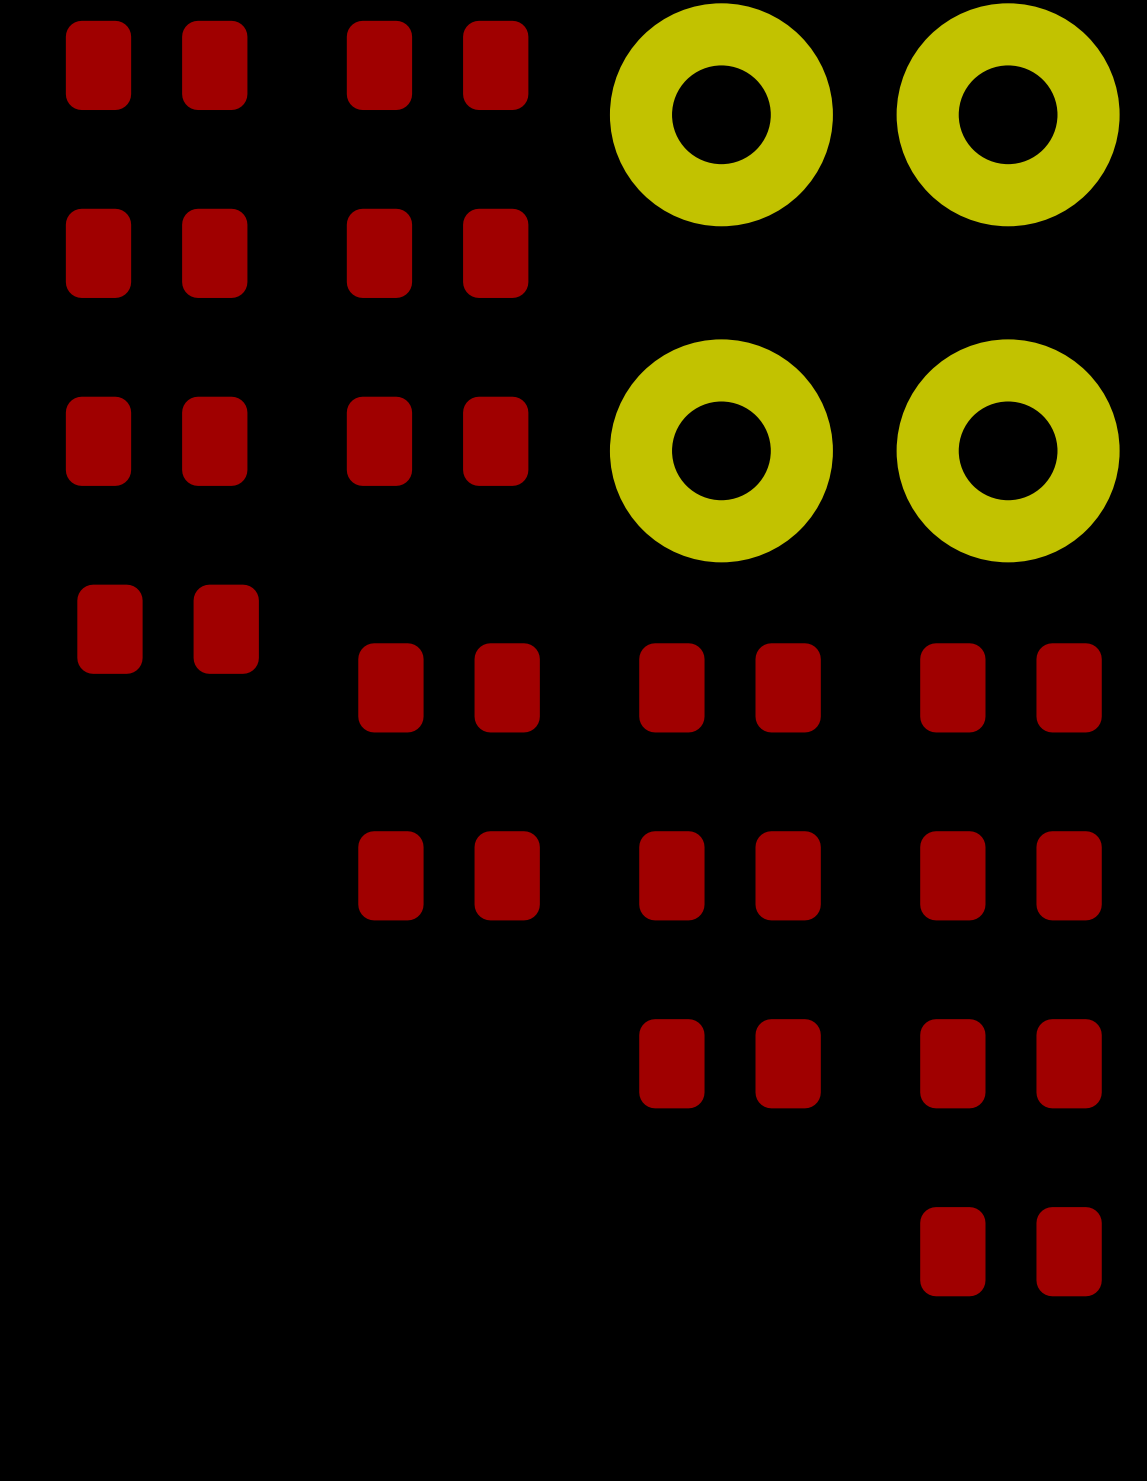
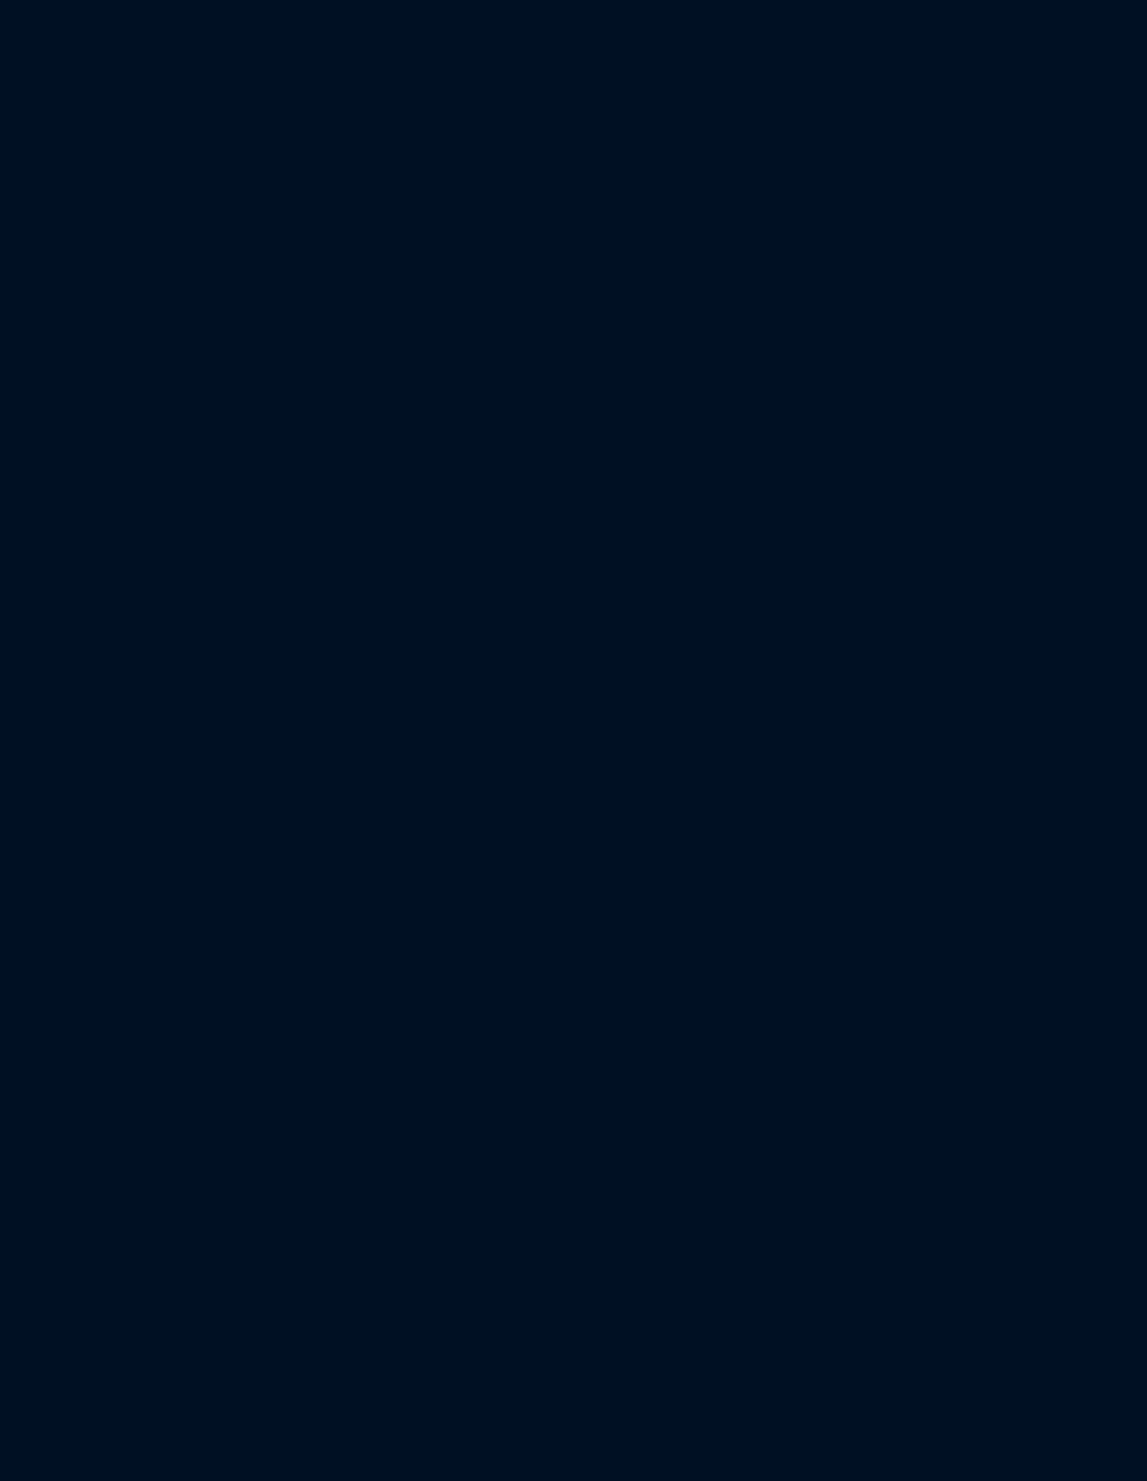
part: (156, 65) -> none
part: (437, 65) -> none
part: (156, 253) -> none
part: (437, 253) -> none
part: (721, 282) -> none
part: (1008, 282) -> none
part: (156, 441) -> none
part: (437, 441) -> none
part: (168, 629) -> none
part: (449, 687) -> none
part: (730, 687) -> none
part: (1010, 687) -> none
part: (449, 875) -> none
part: (730, 875) -> none
part: (1010, 875) -> none
part: (730, 1063) -> none
part: (1010, 1063) -> none
part: (1010, 1251) -> none

